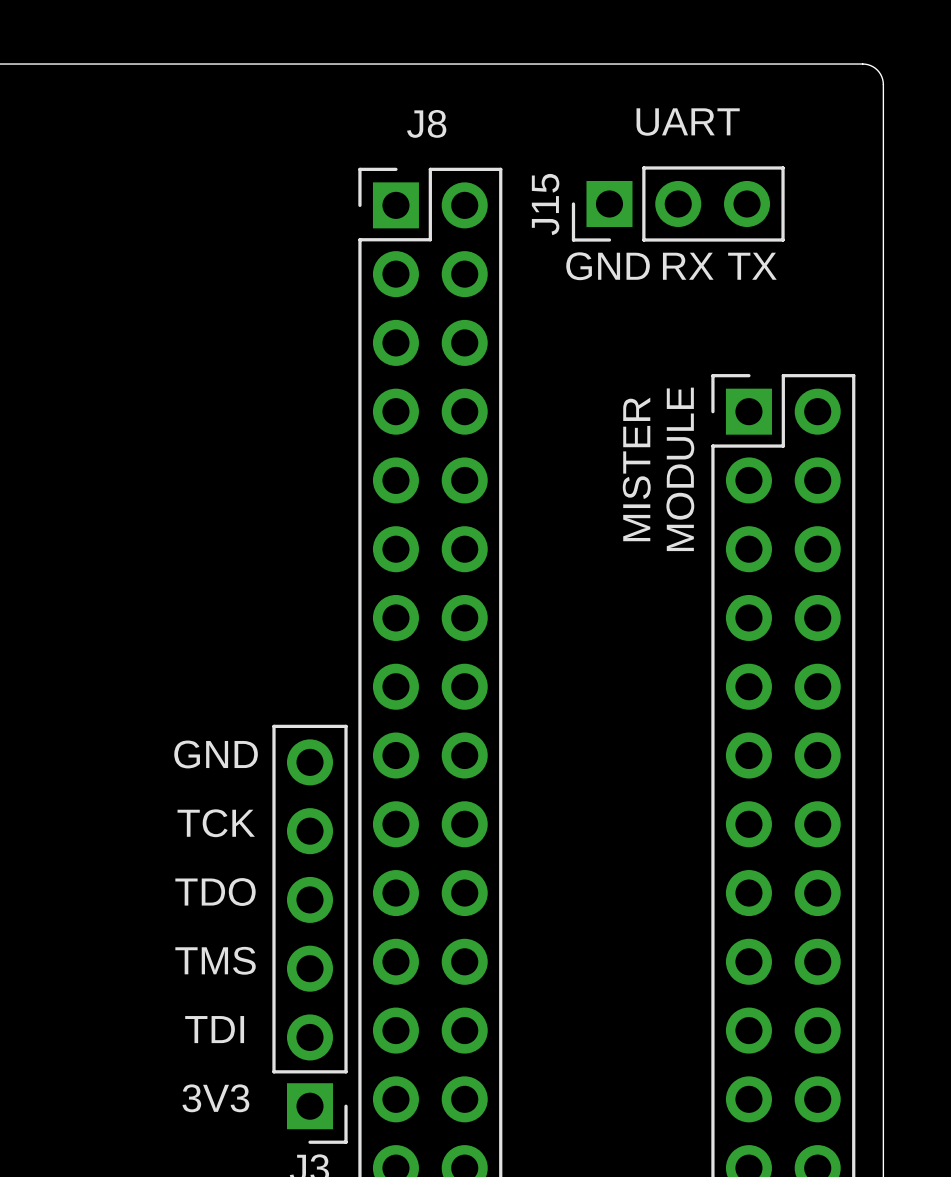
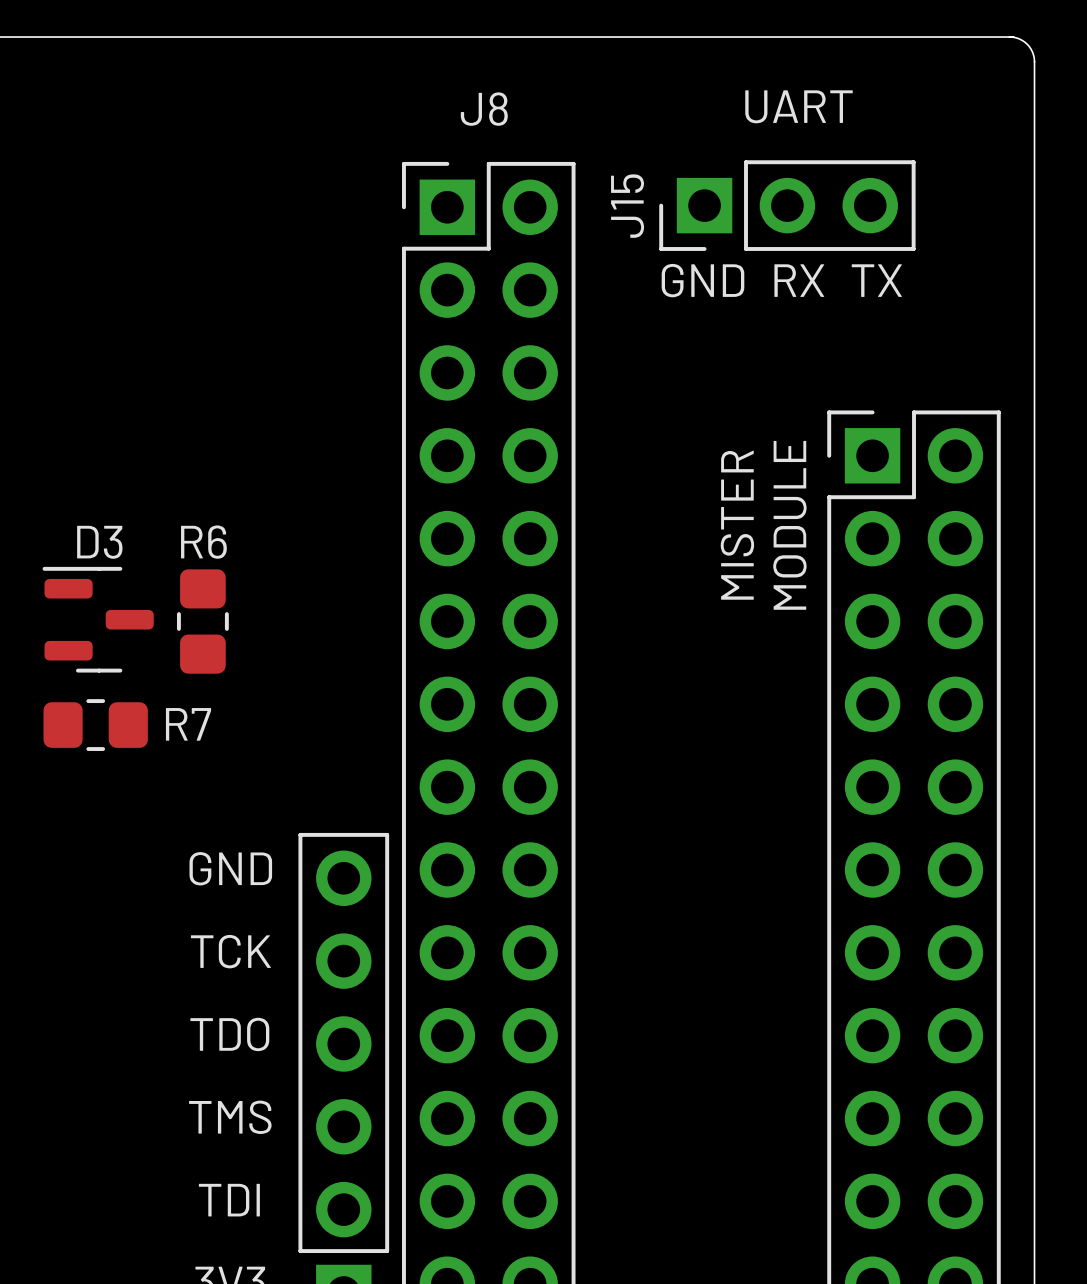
D3: none -> (98, 619)
R6: none -> (202, 621)
R7: none -> (95, 725)

